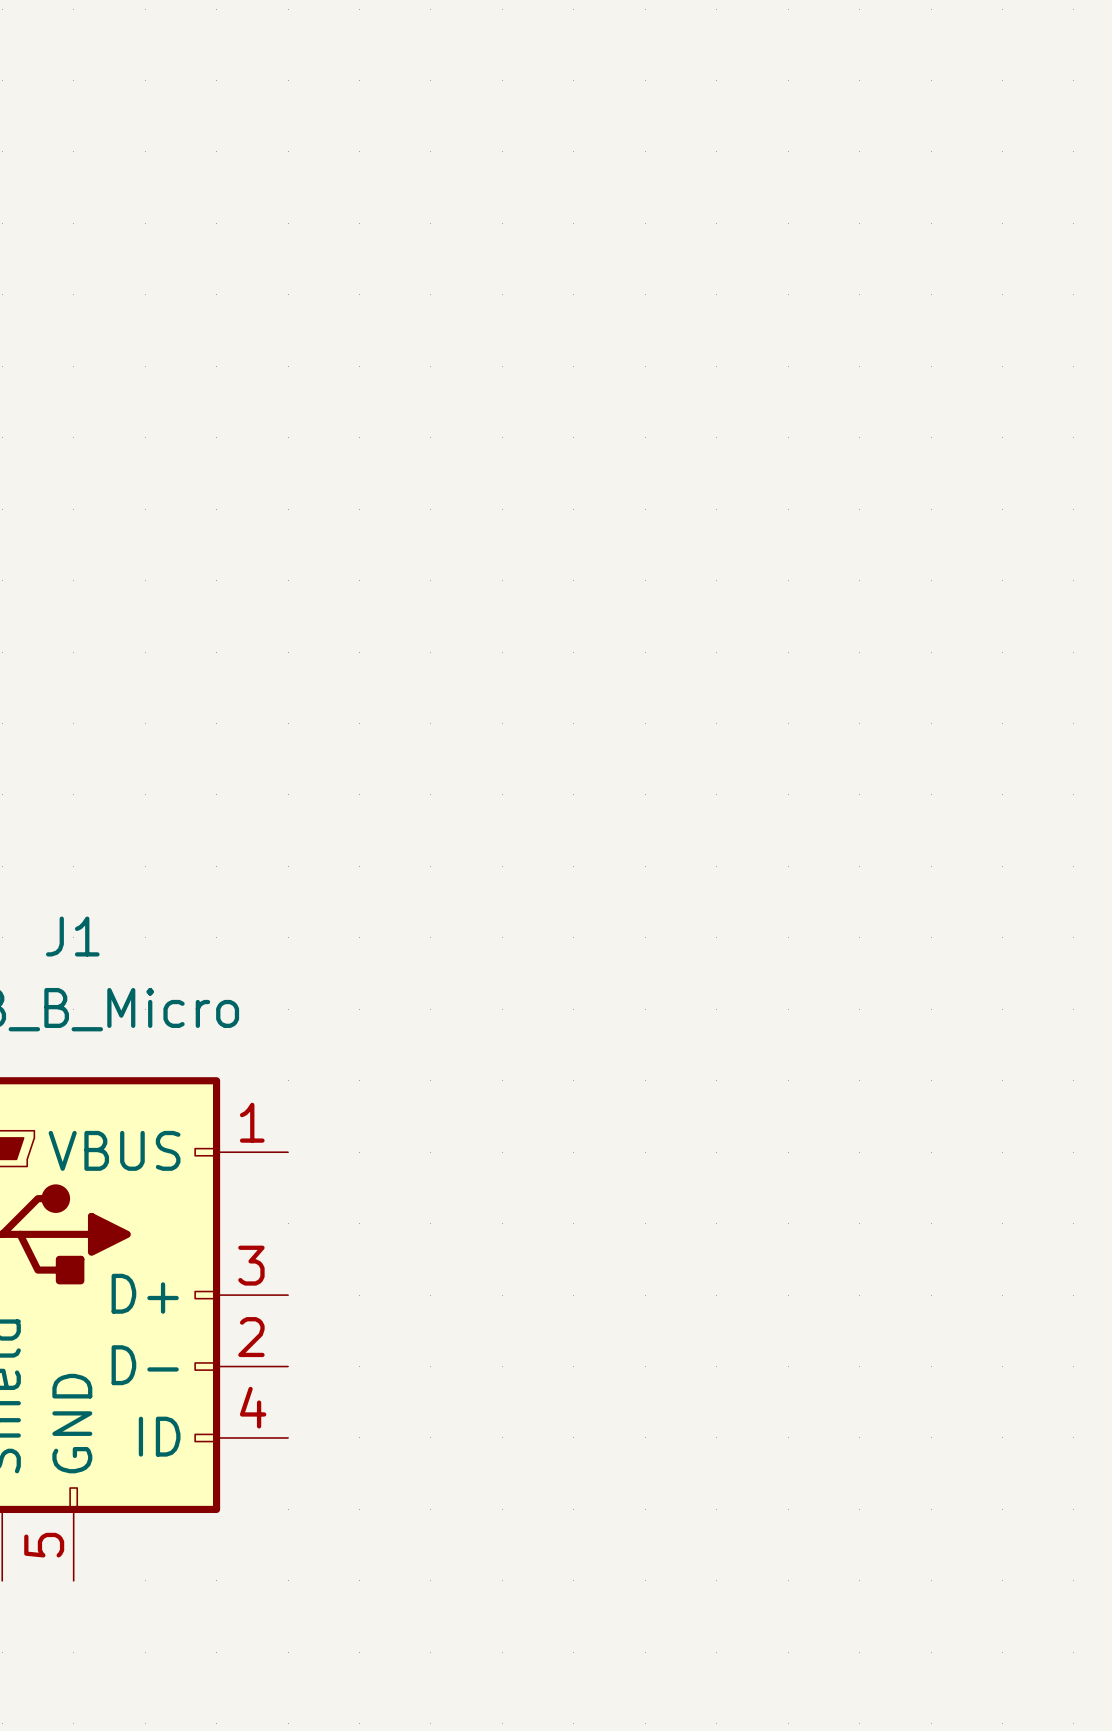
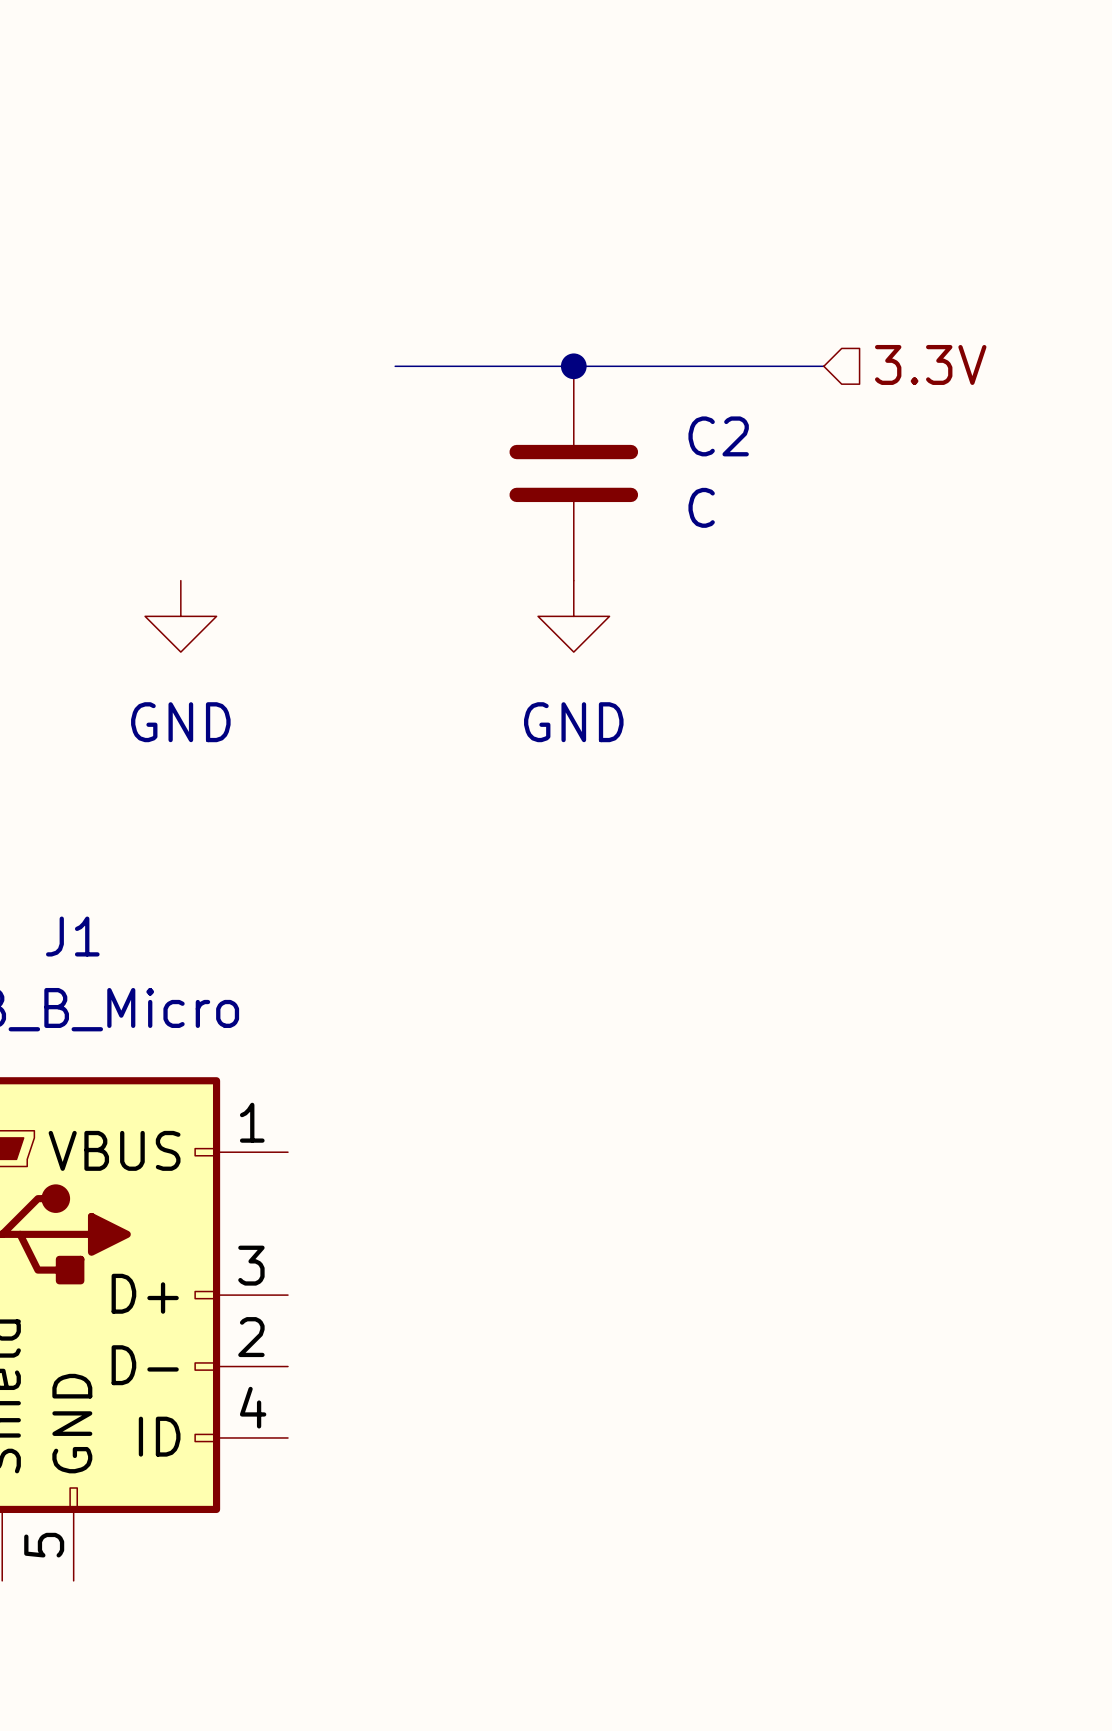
hierarchical label: none -> 3.3V (930, 364)
wire: none -> (395, 366) (823, 366)
junction: none -> (573, 366)
C2: none -> C (573, 473)
power symbol: none -> GND (180, 616)
power symbol: none -> GND (573, 616)

